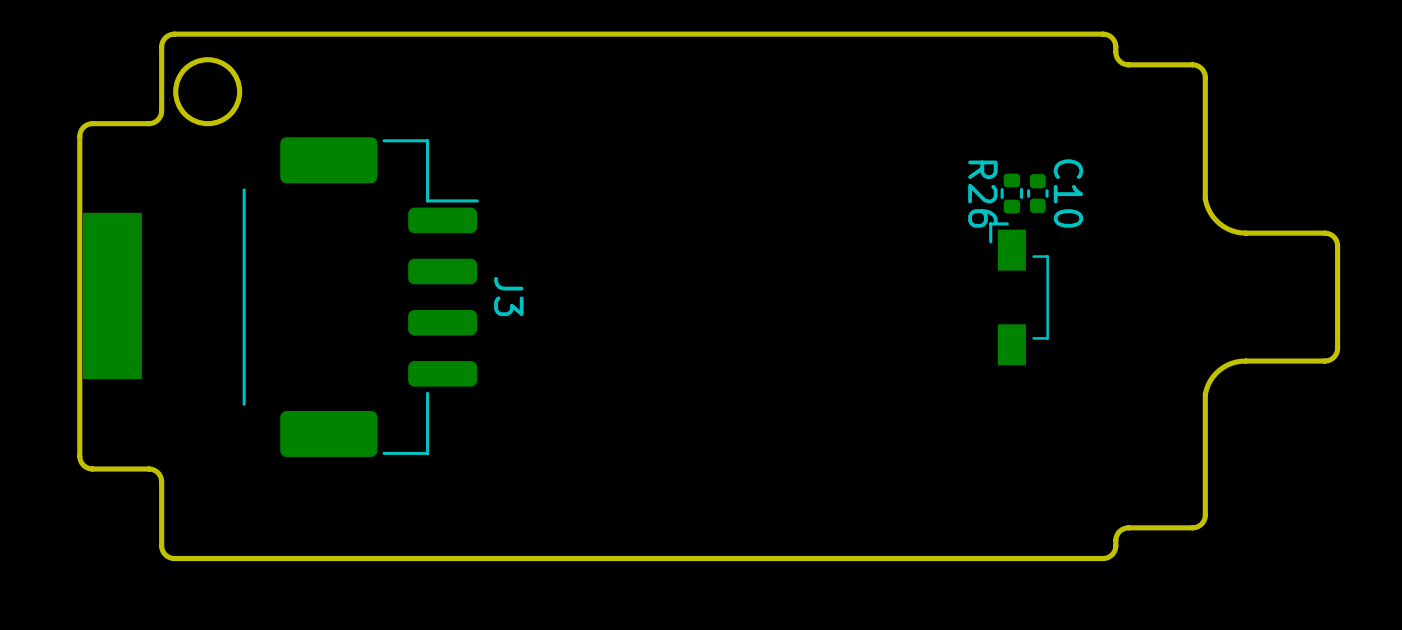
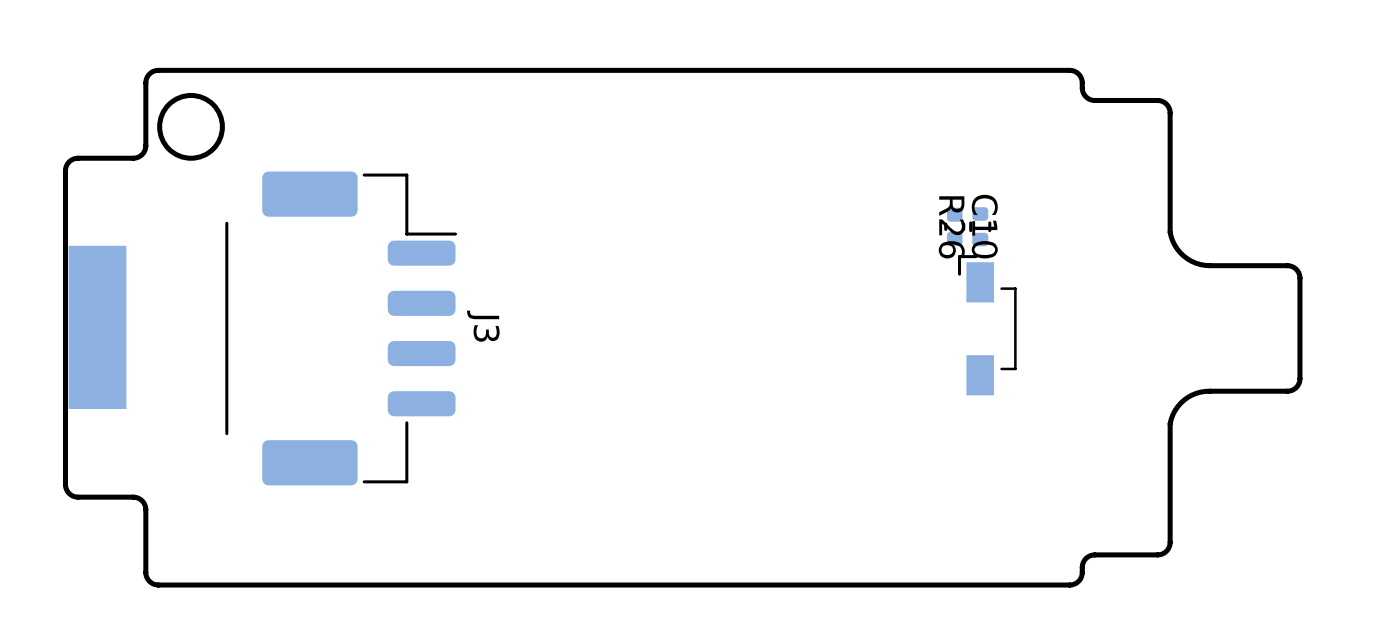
C10 position: (1037, 193) -> (954, 226)

